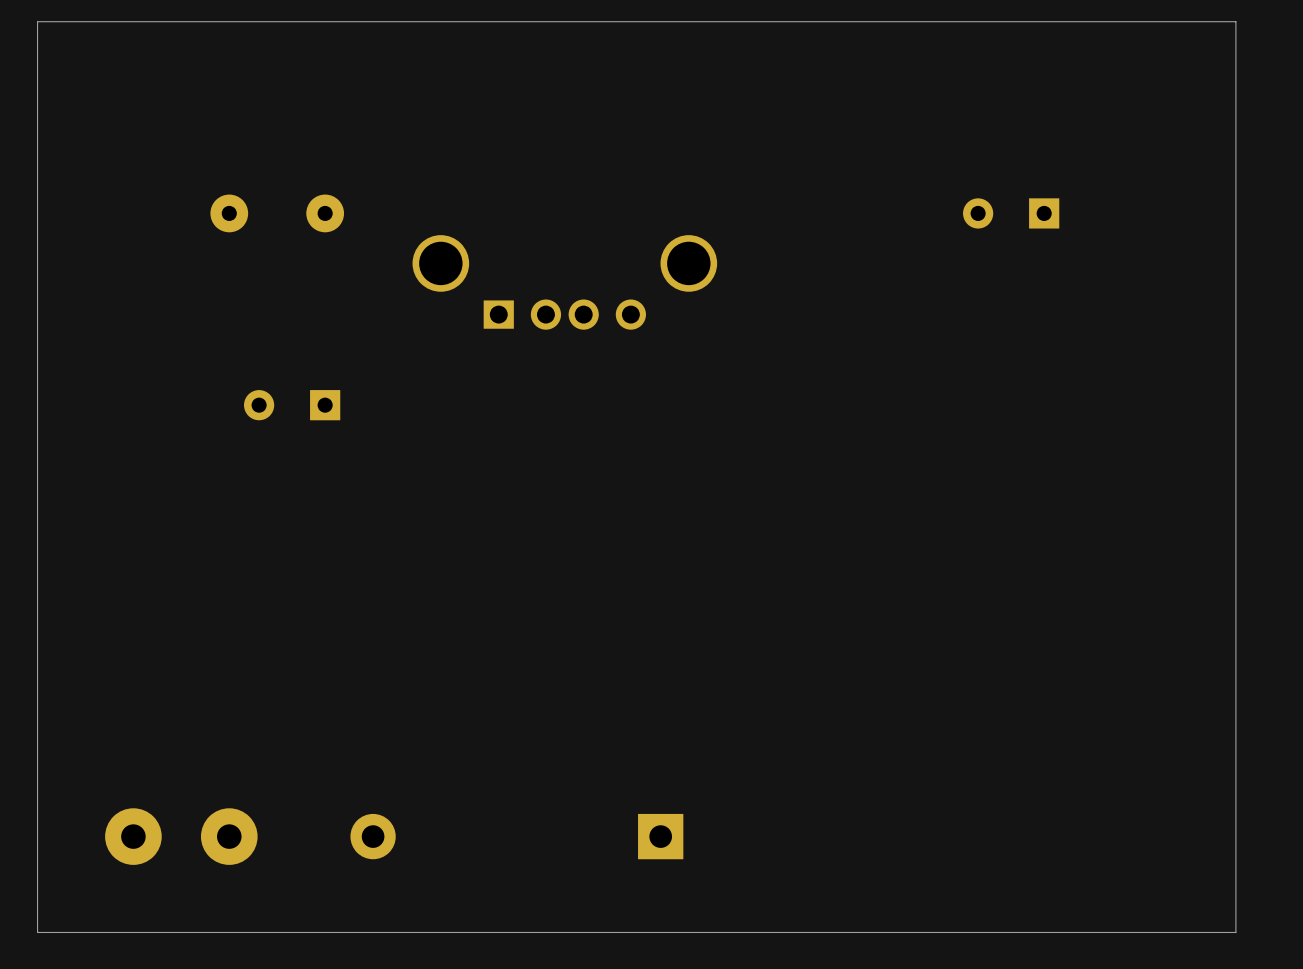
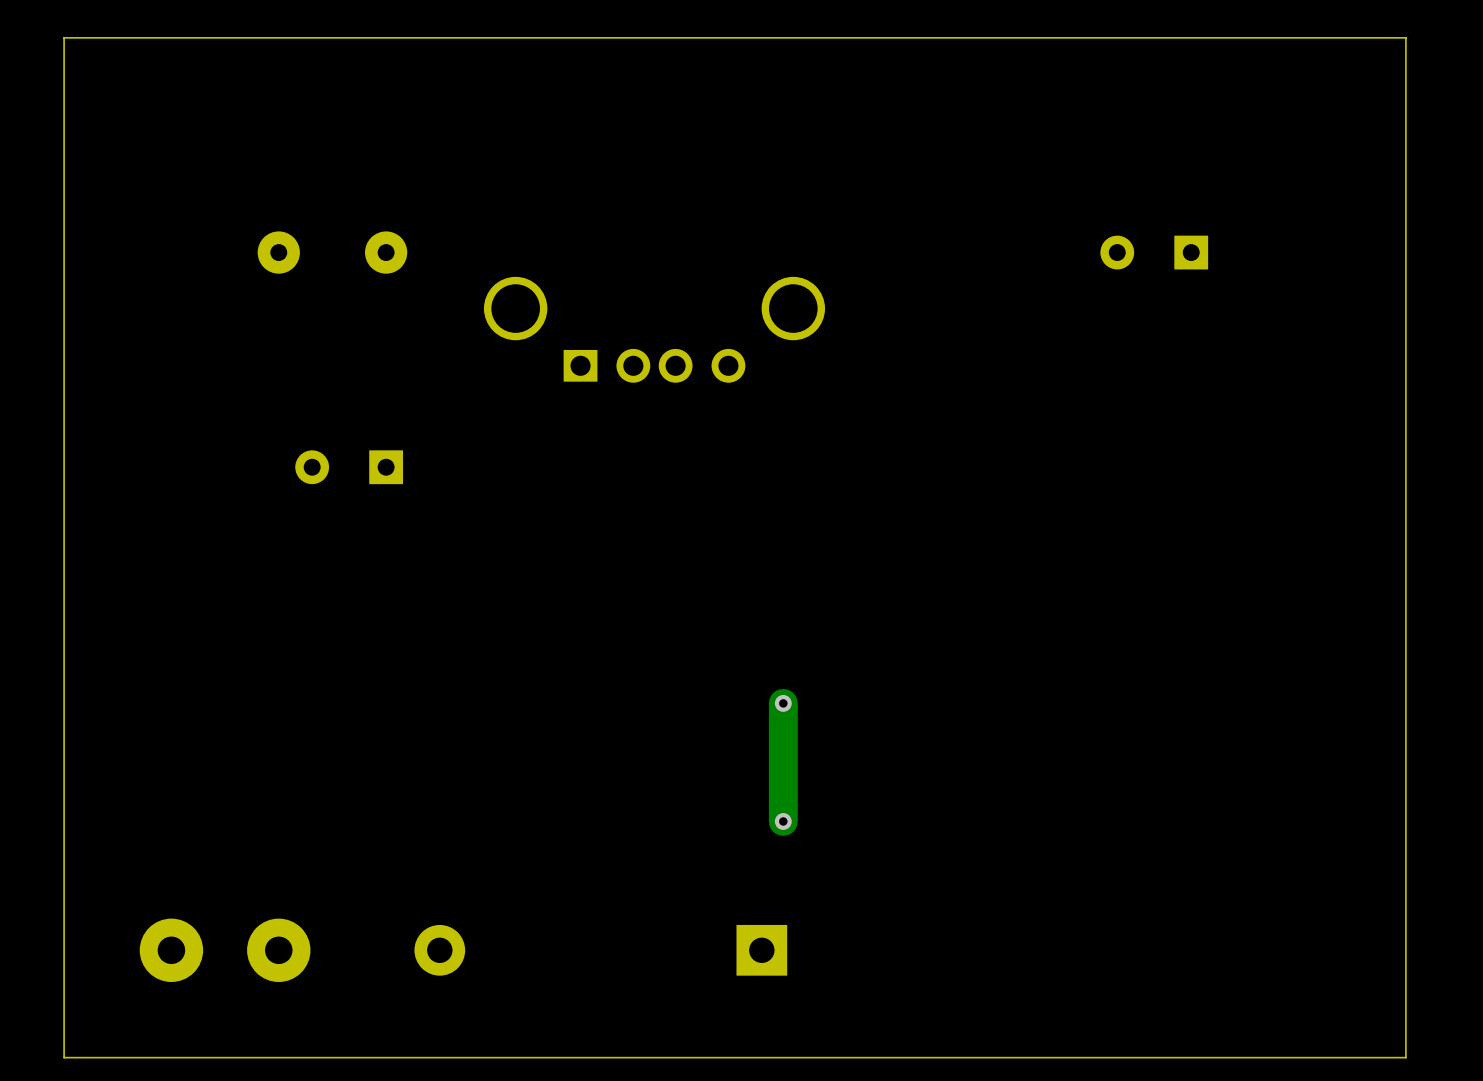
track: none -> (783, 703) (783, 821)
via: none -> (783, 703)
via: none -> (783, 821)

